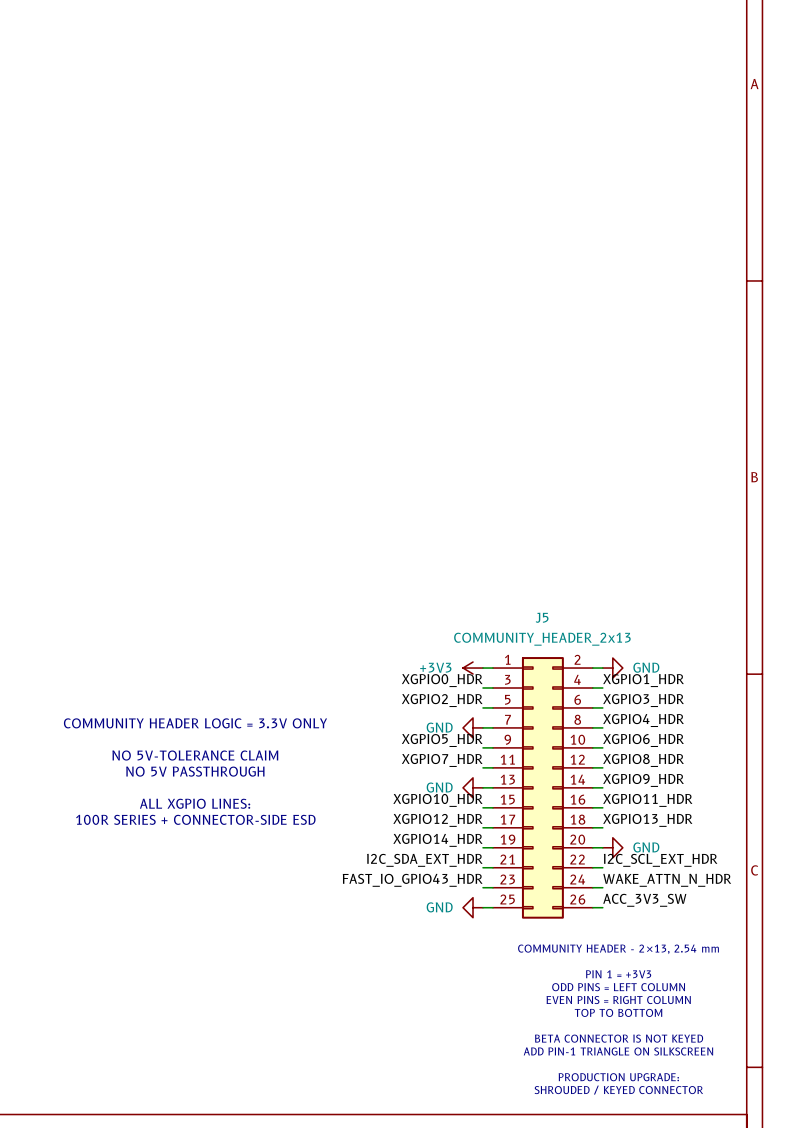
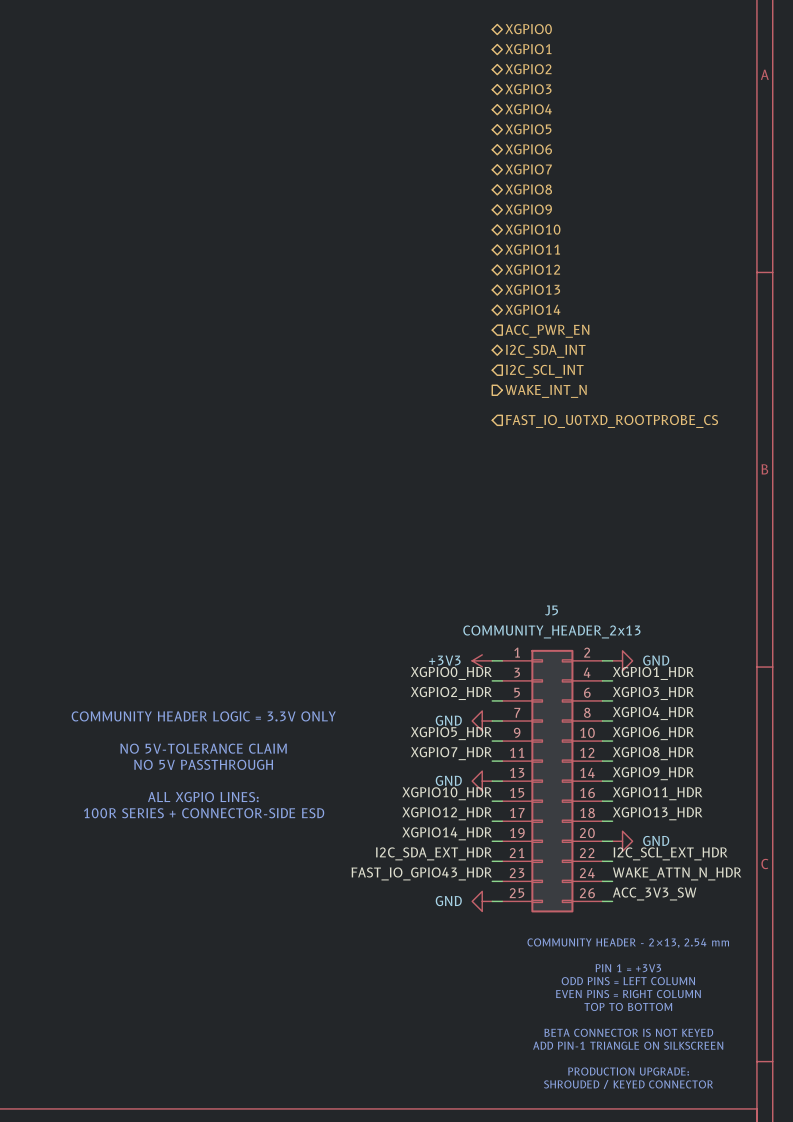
hierarchical label: none -> XGPIO0 (528, 29)
hierarchical label: none -> XGPIO1 (528, 49)
hierarchical label: none -> XGPIO2 (528, 69)
hierarchical label: none -> XGPIO3 (528, 89)
hierarchical label: none -> XGPIO4 (528, 109)
hierarchical label: none -> XGPIO5 (528, 129)
hierarchical label: none -> XGPIO6 (528, 149)
hierarchical label: none -> XGPIO7 (528, 169)
hierarchical label: none -> XGPIO8 (528, 189)
hierarchical label: none -> XGPIO9 (528, 209)
hierarchical label: none -> XGPIO10 (532, 229)
hierarchical label: none -> XGPIO11 (532, 249)
hierarchical label: none -> XGPIO12 (532, 269)
hierarchical label: none -> XGPIO13 (532, 289)
hierarchical label: none -> XGPIO14 (532, 309)
hierarchical label: none -> ACC_PWR_EN (547, 331)
hierarchical label: none -> I2C_SDA_INT (545, 351)
hierarchical label: none -> I2C_SCL_INT (544, 371)
hierarchical label: none -> WAKE_INT_N (546, 391)
hierarchical label: none -> FAST_IO_U0TXD_ROOTPROBE_CS (612, 421)

